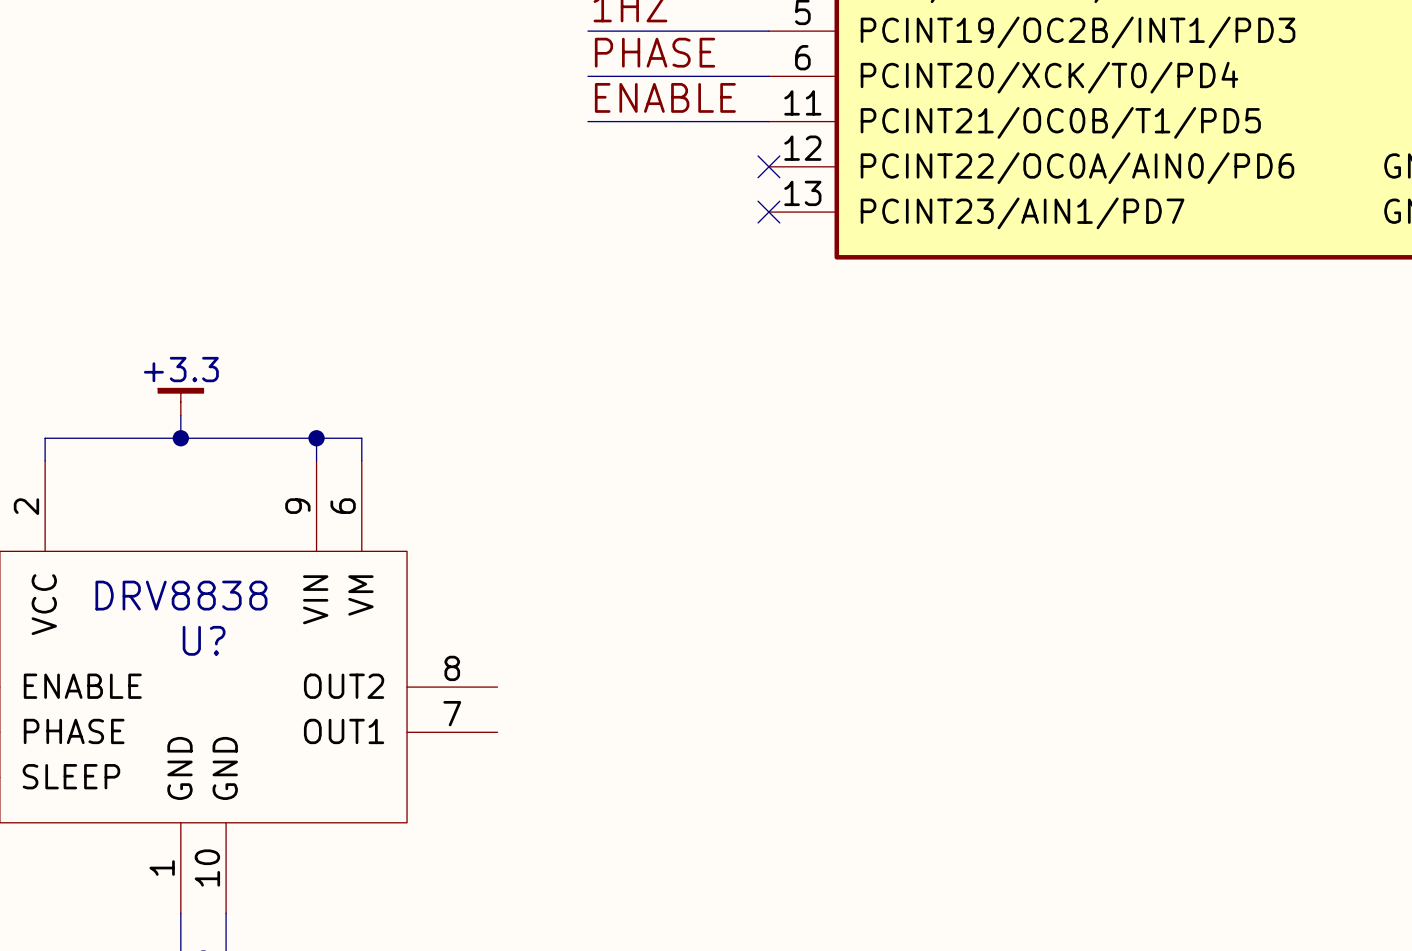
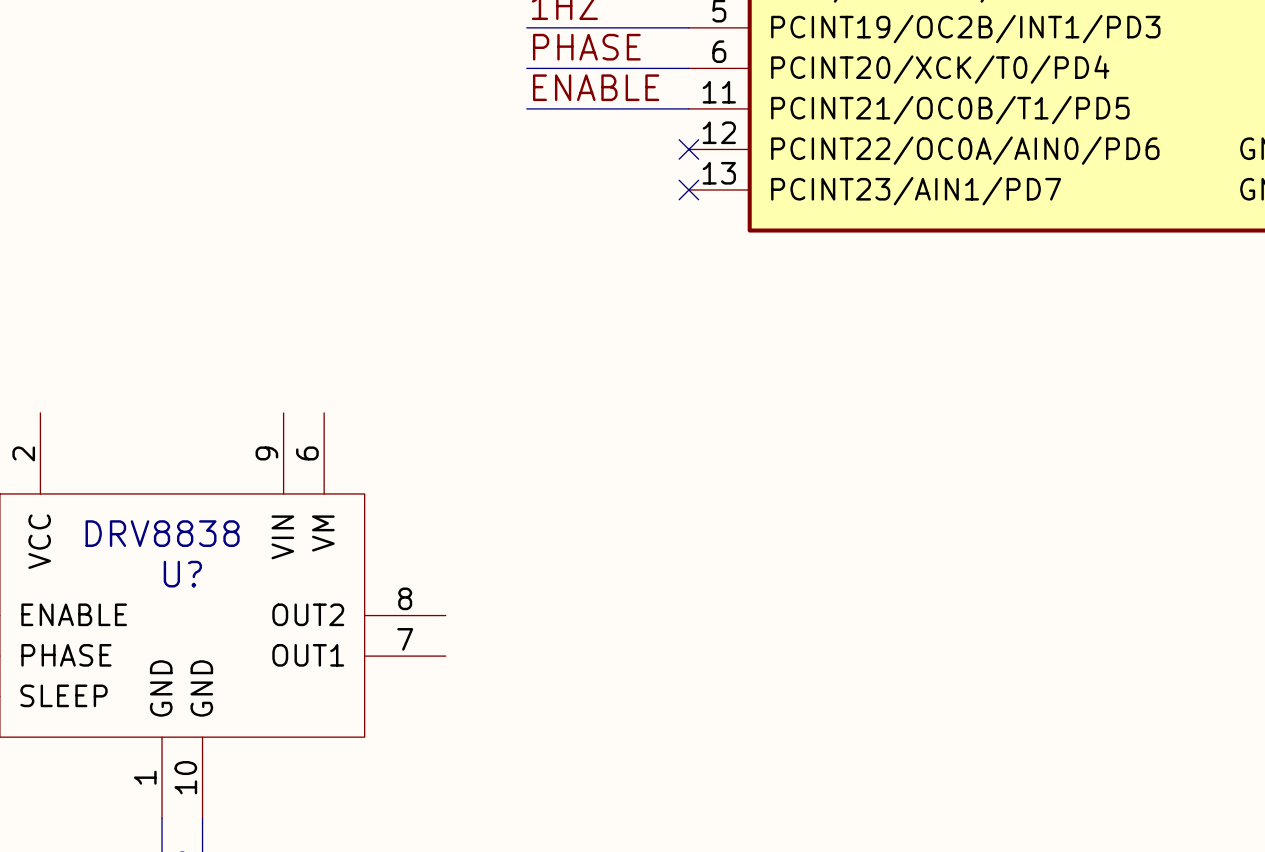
power symbol: +3.3 (180, 402) -> none
wire: (180, 415) (180, 438) -> none
junction: (180, 438) -> none
wire: (316, 438) (316, 460) -> none
junction: (316, 438) -> none
wire: (45, 460) (45, 438) (361, 438) (361, 460) -> none

